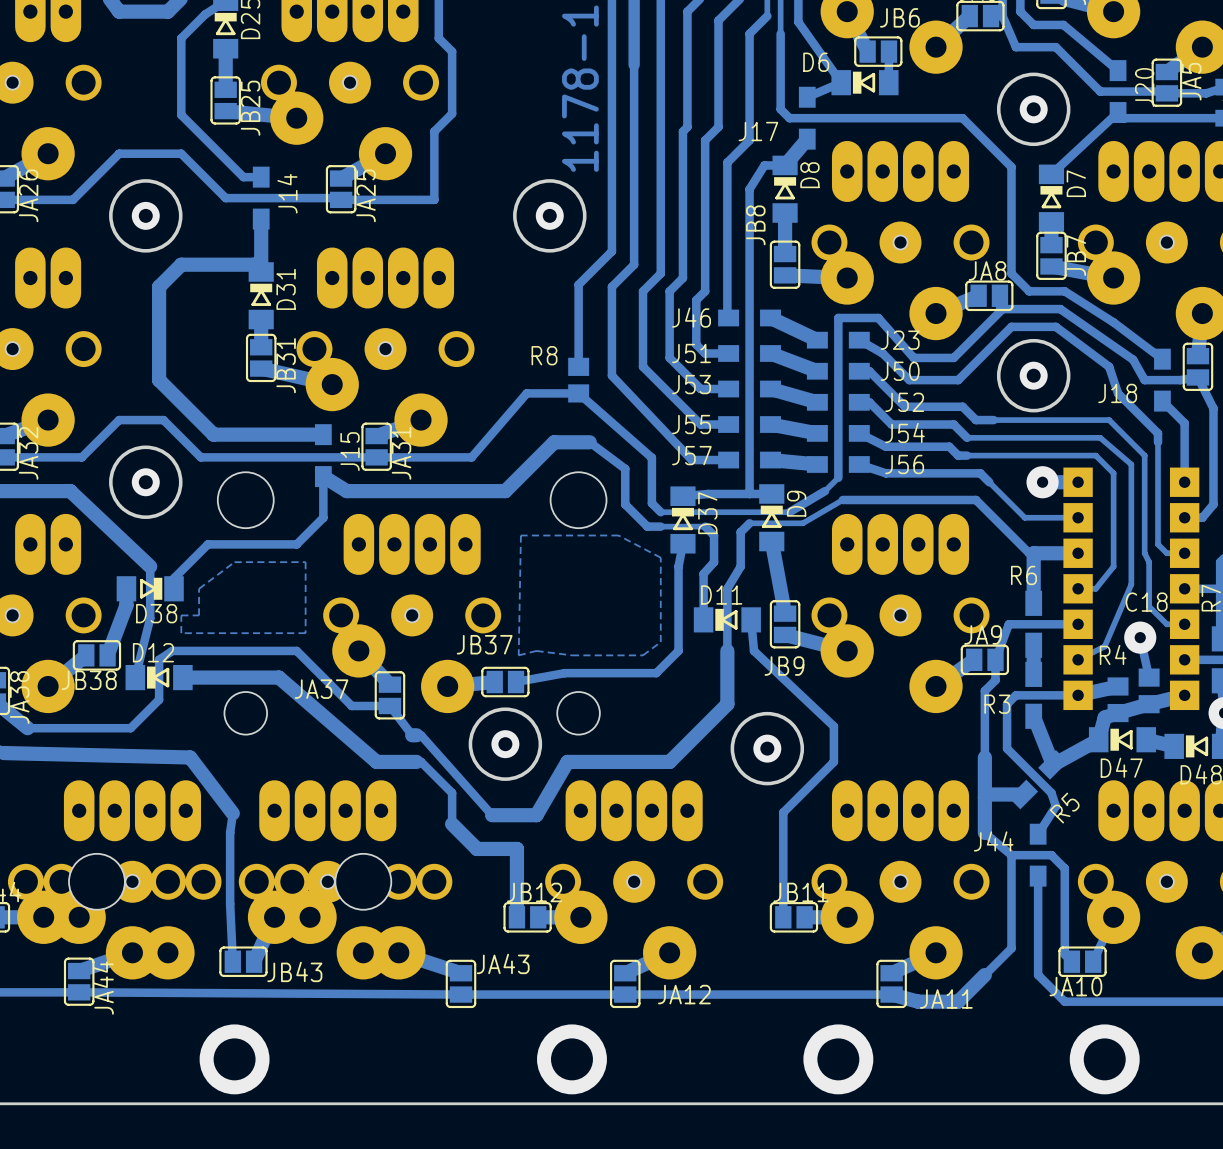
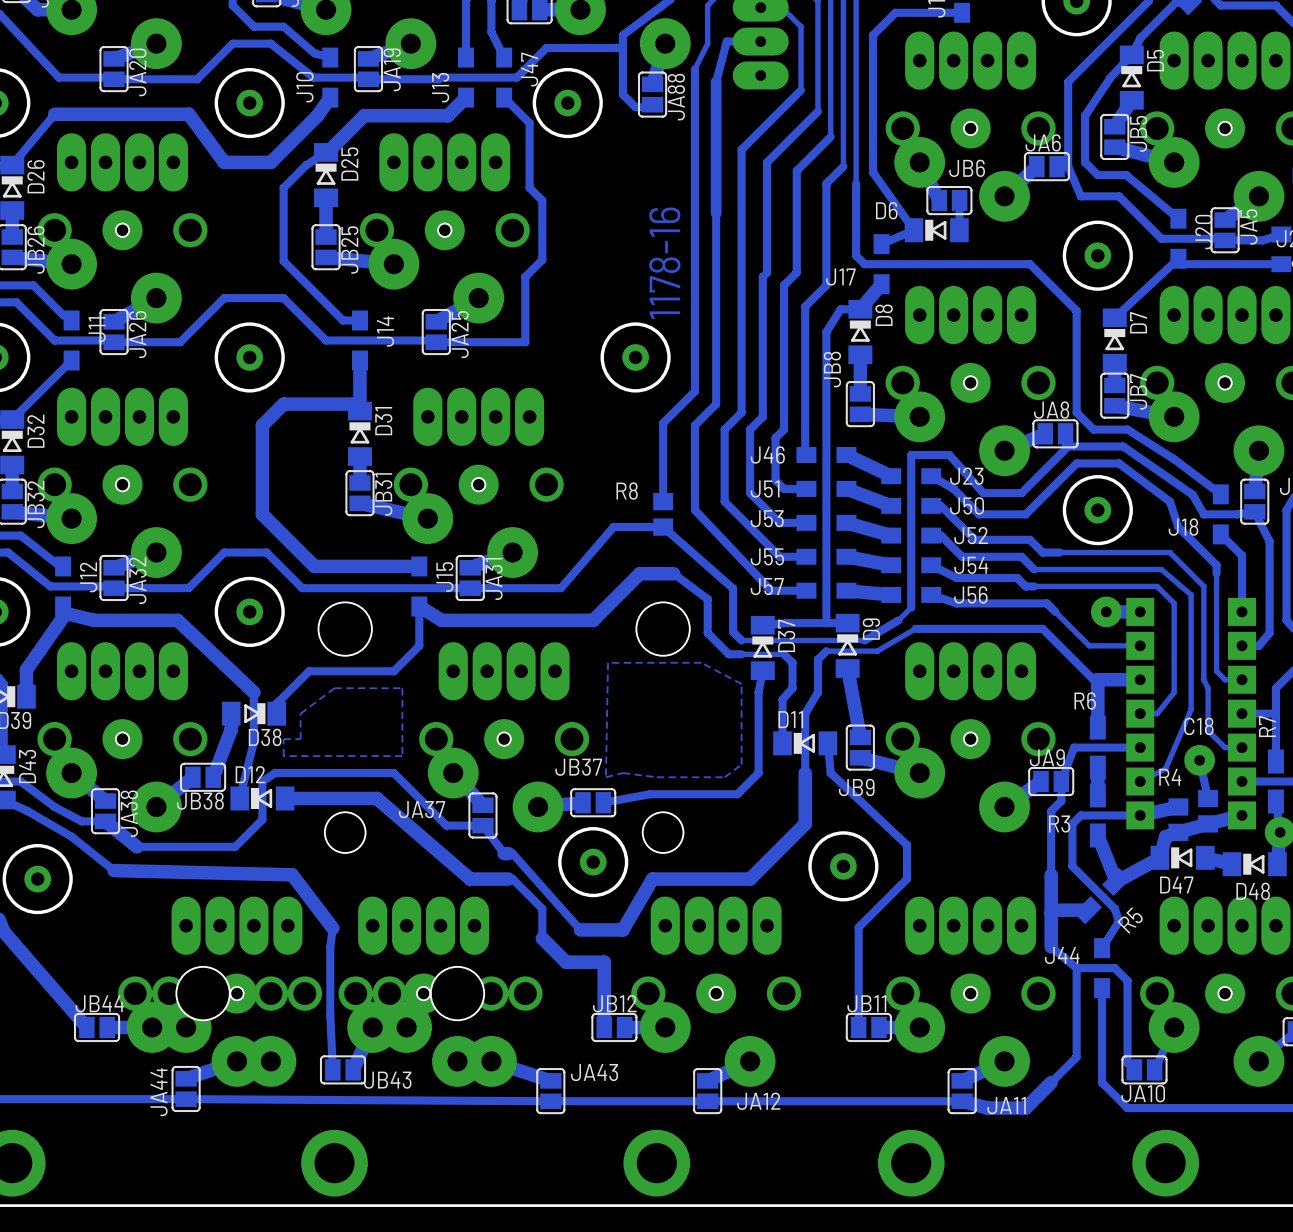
JA44 name position: JA44 (103, 987) -> JA44 (159, 1092)

